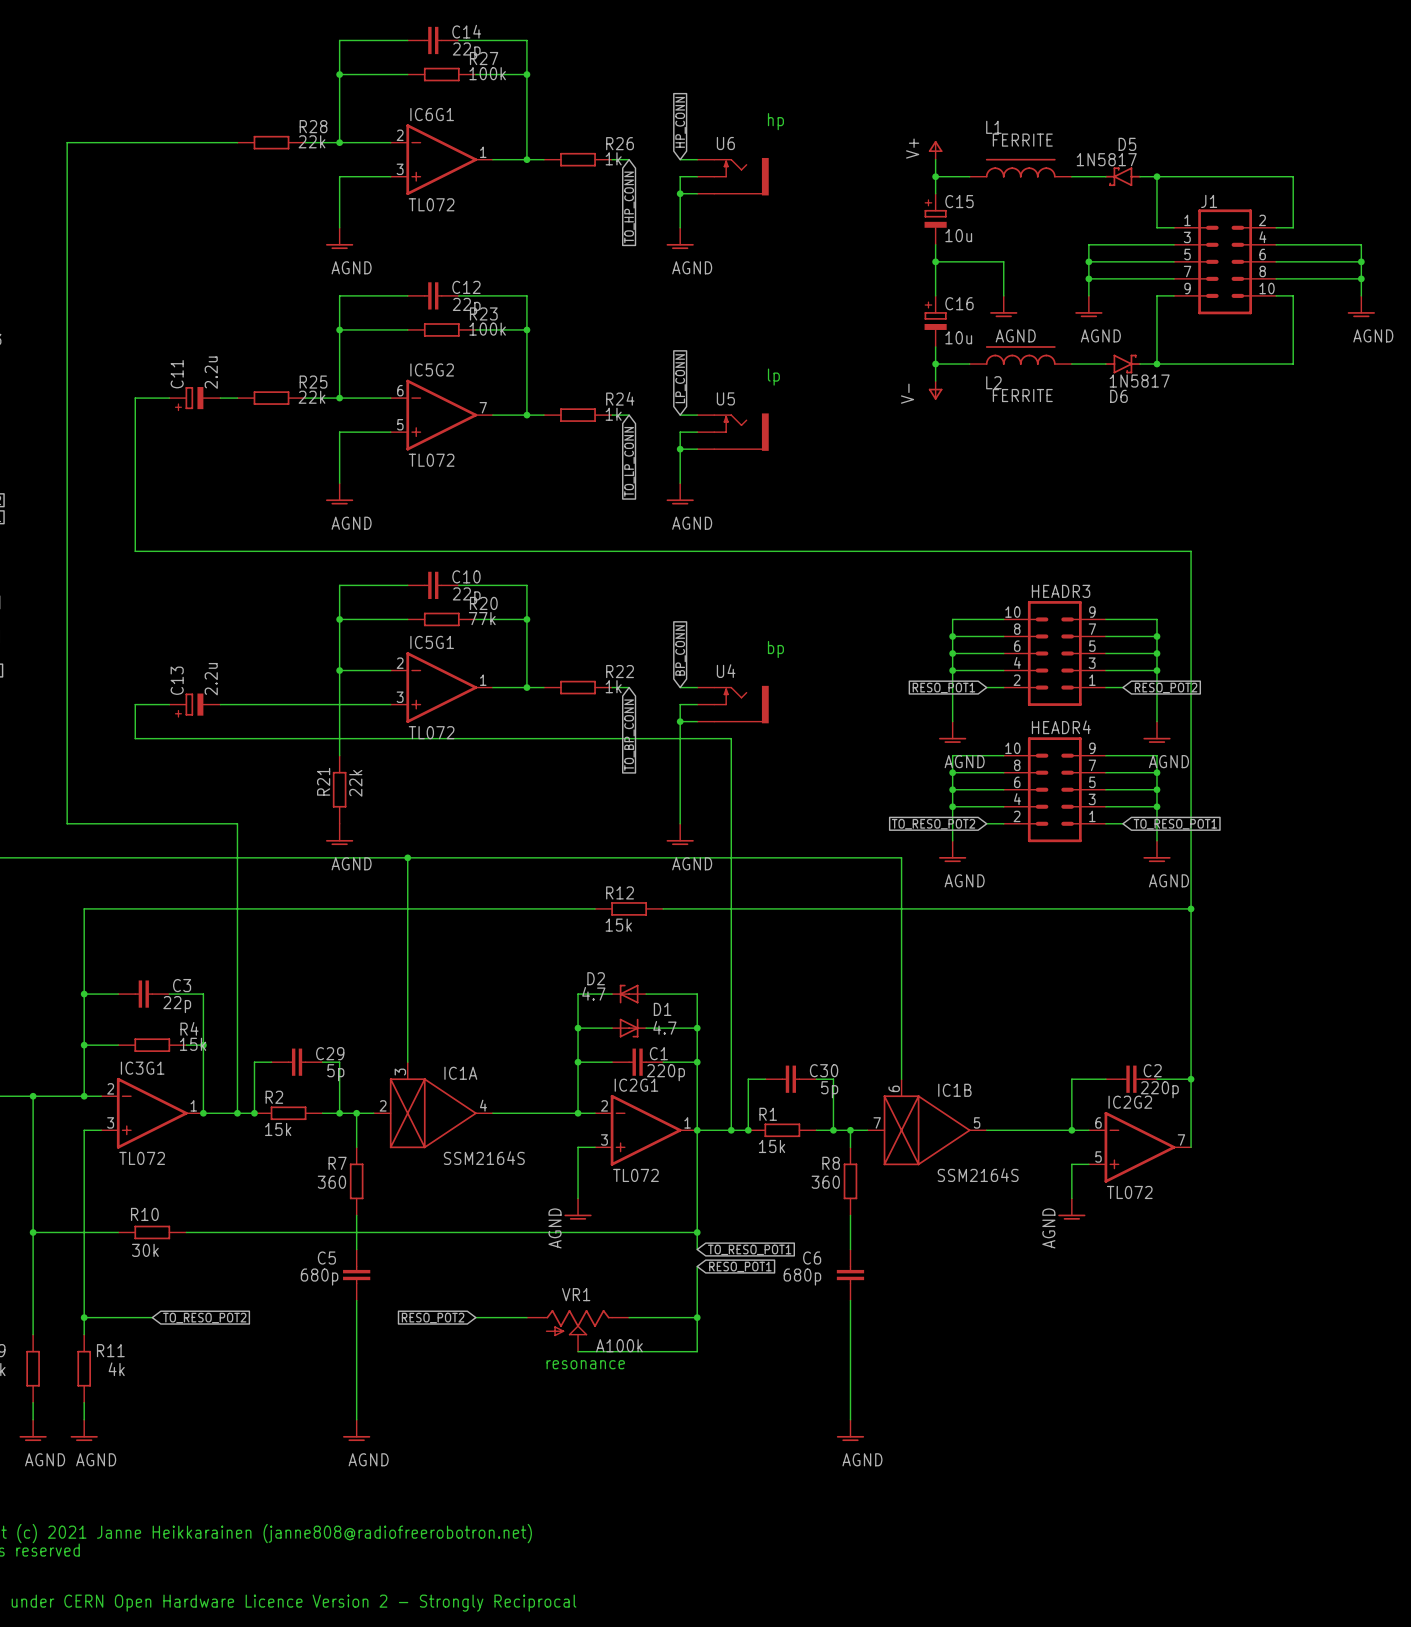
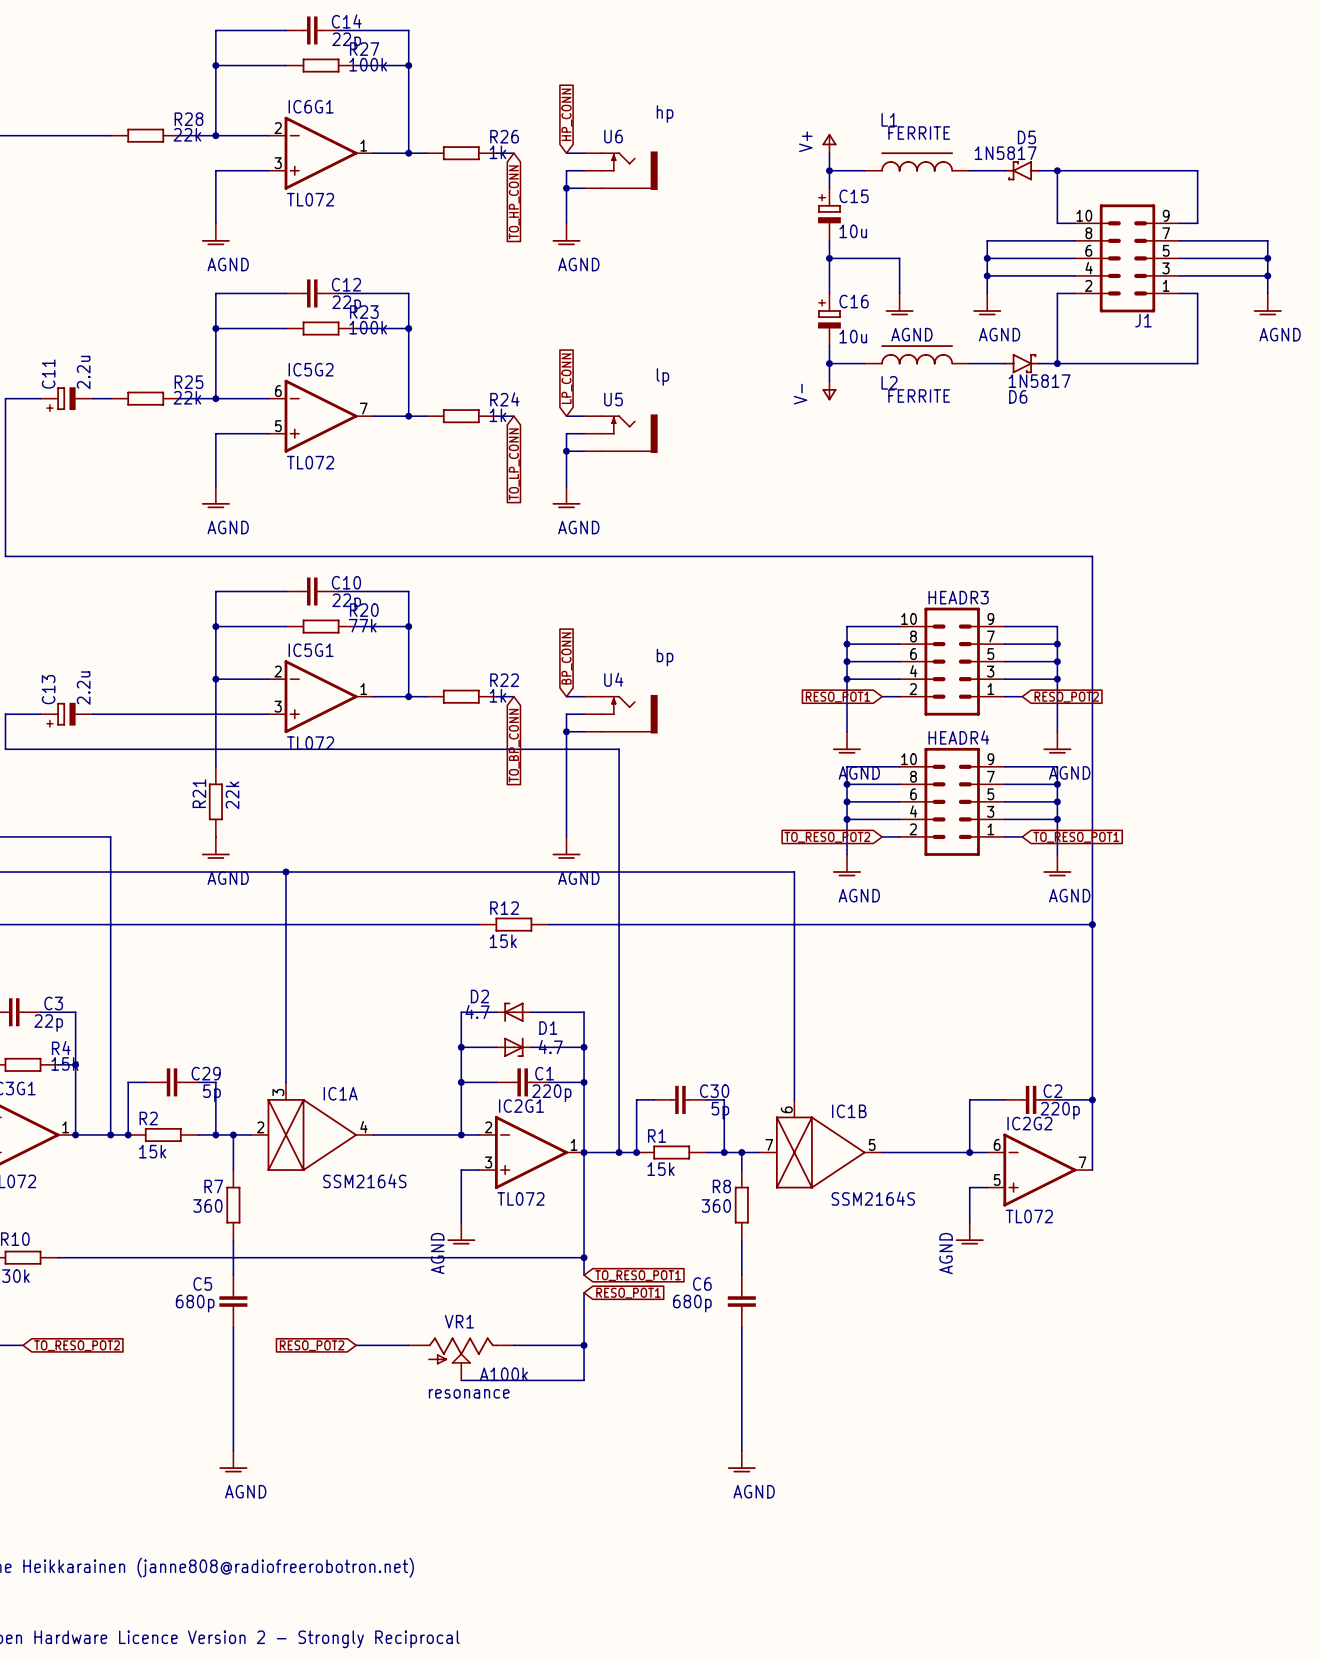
J1 rotation: 0° (1225, 261) -> 180° (1127, 258)

